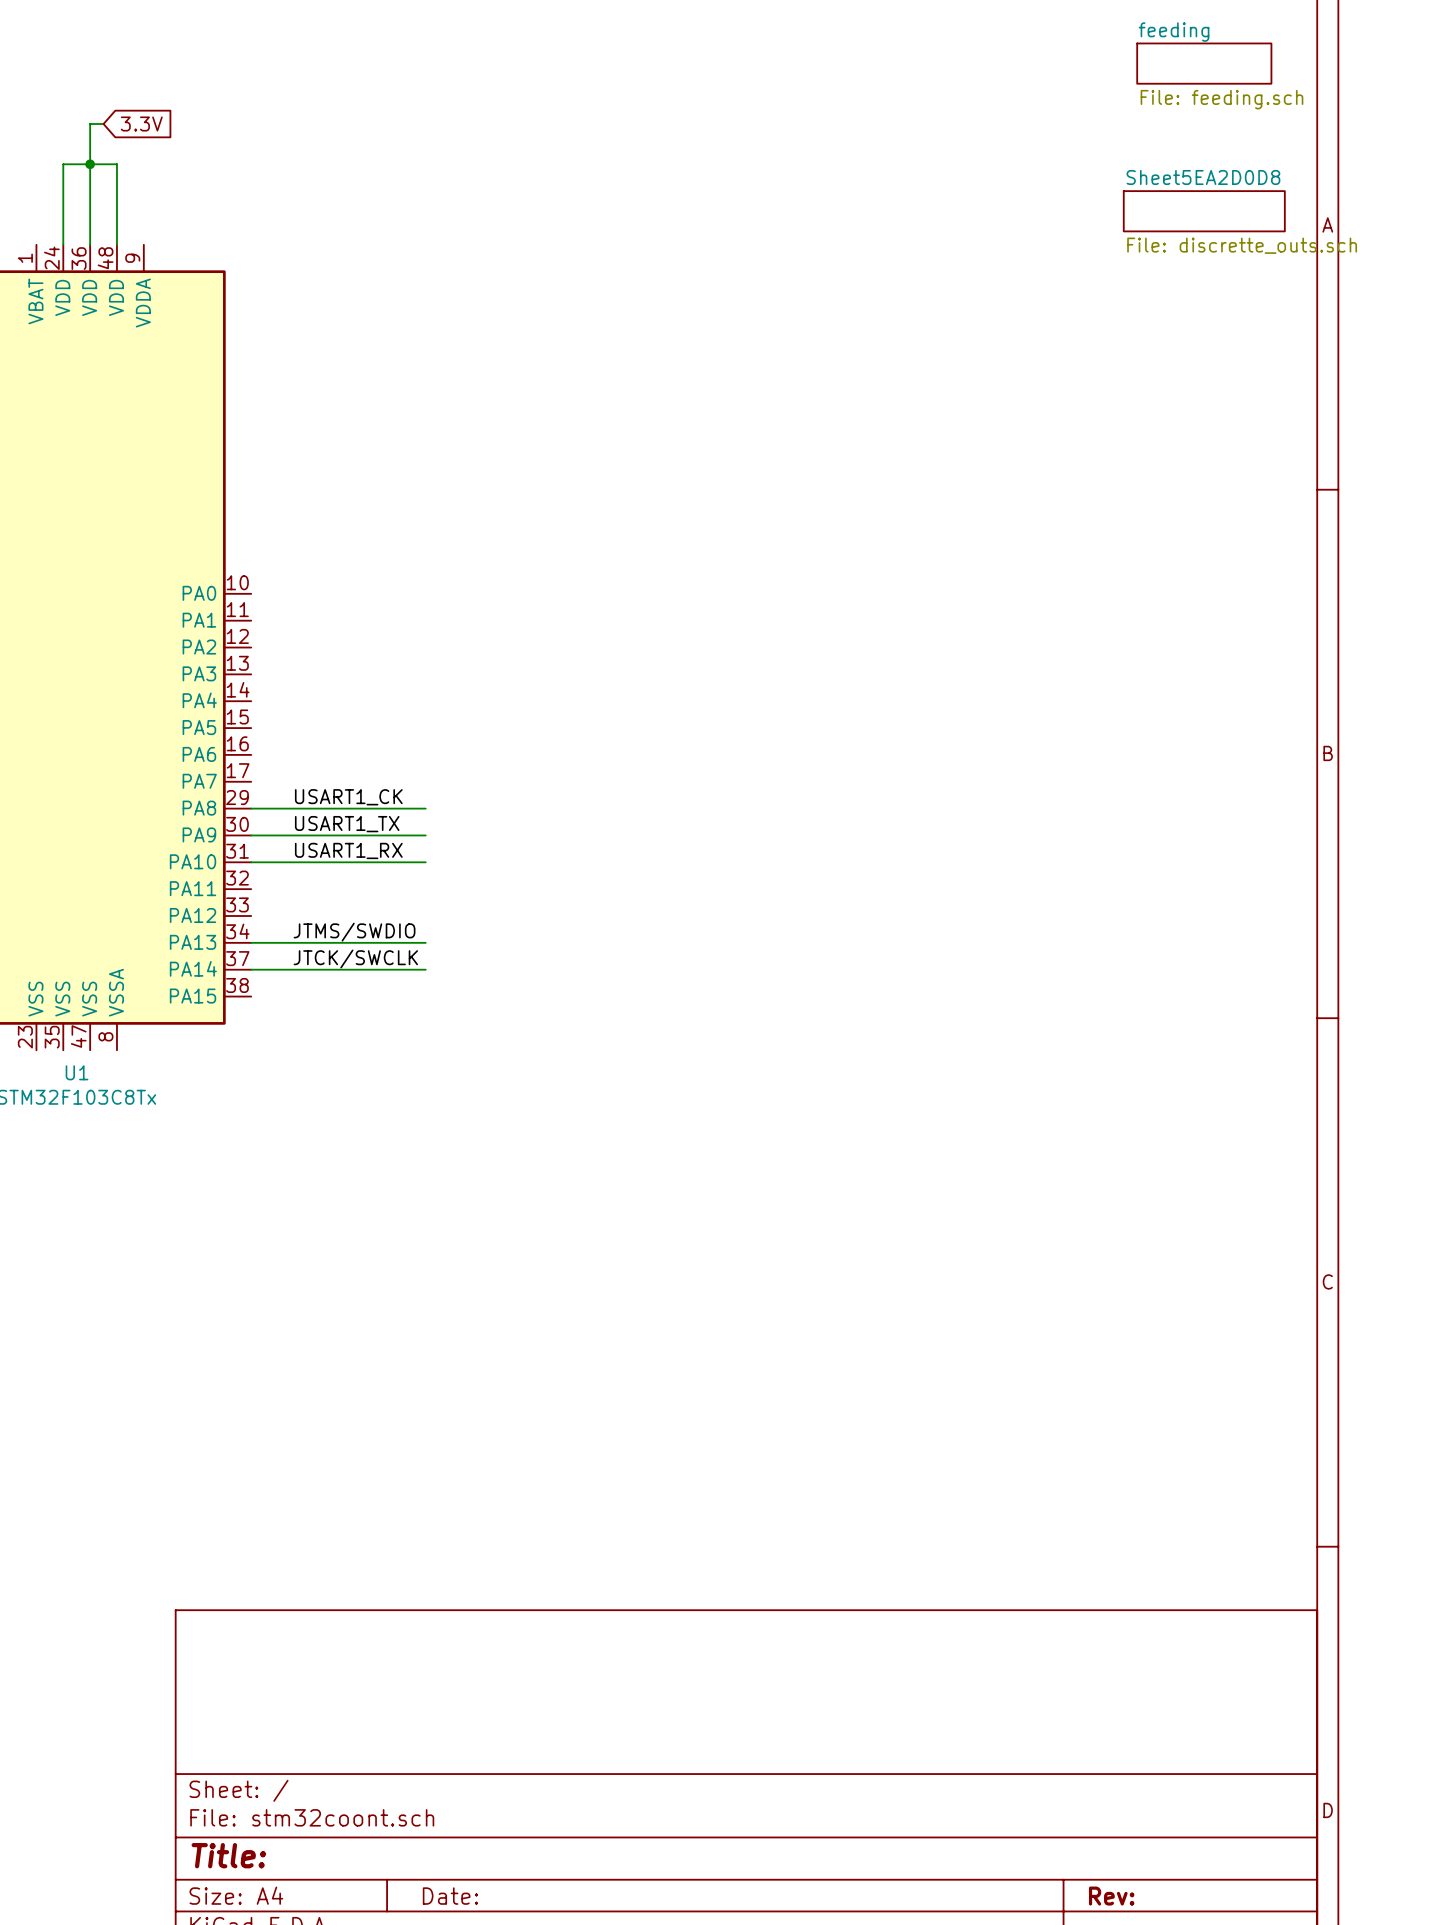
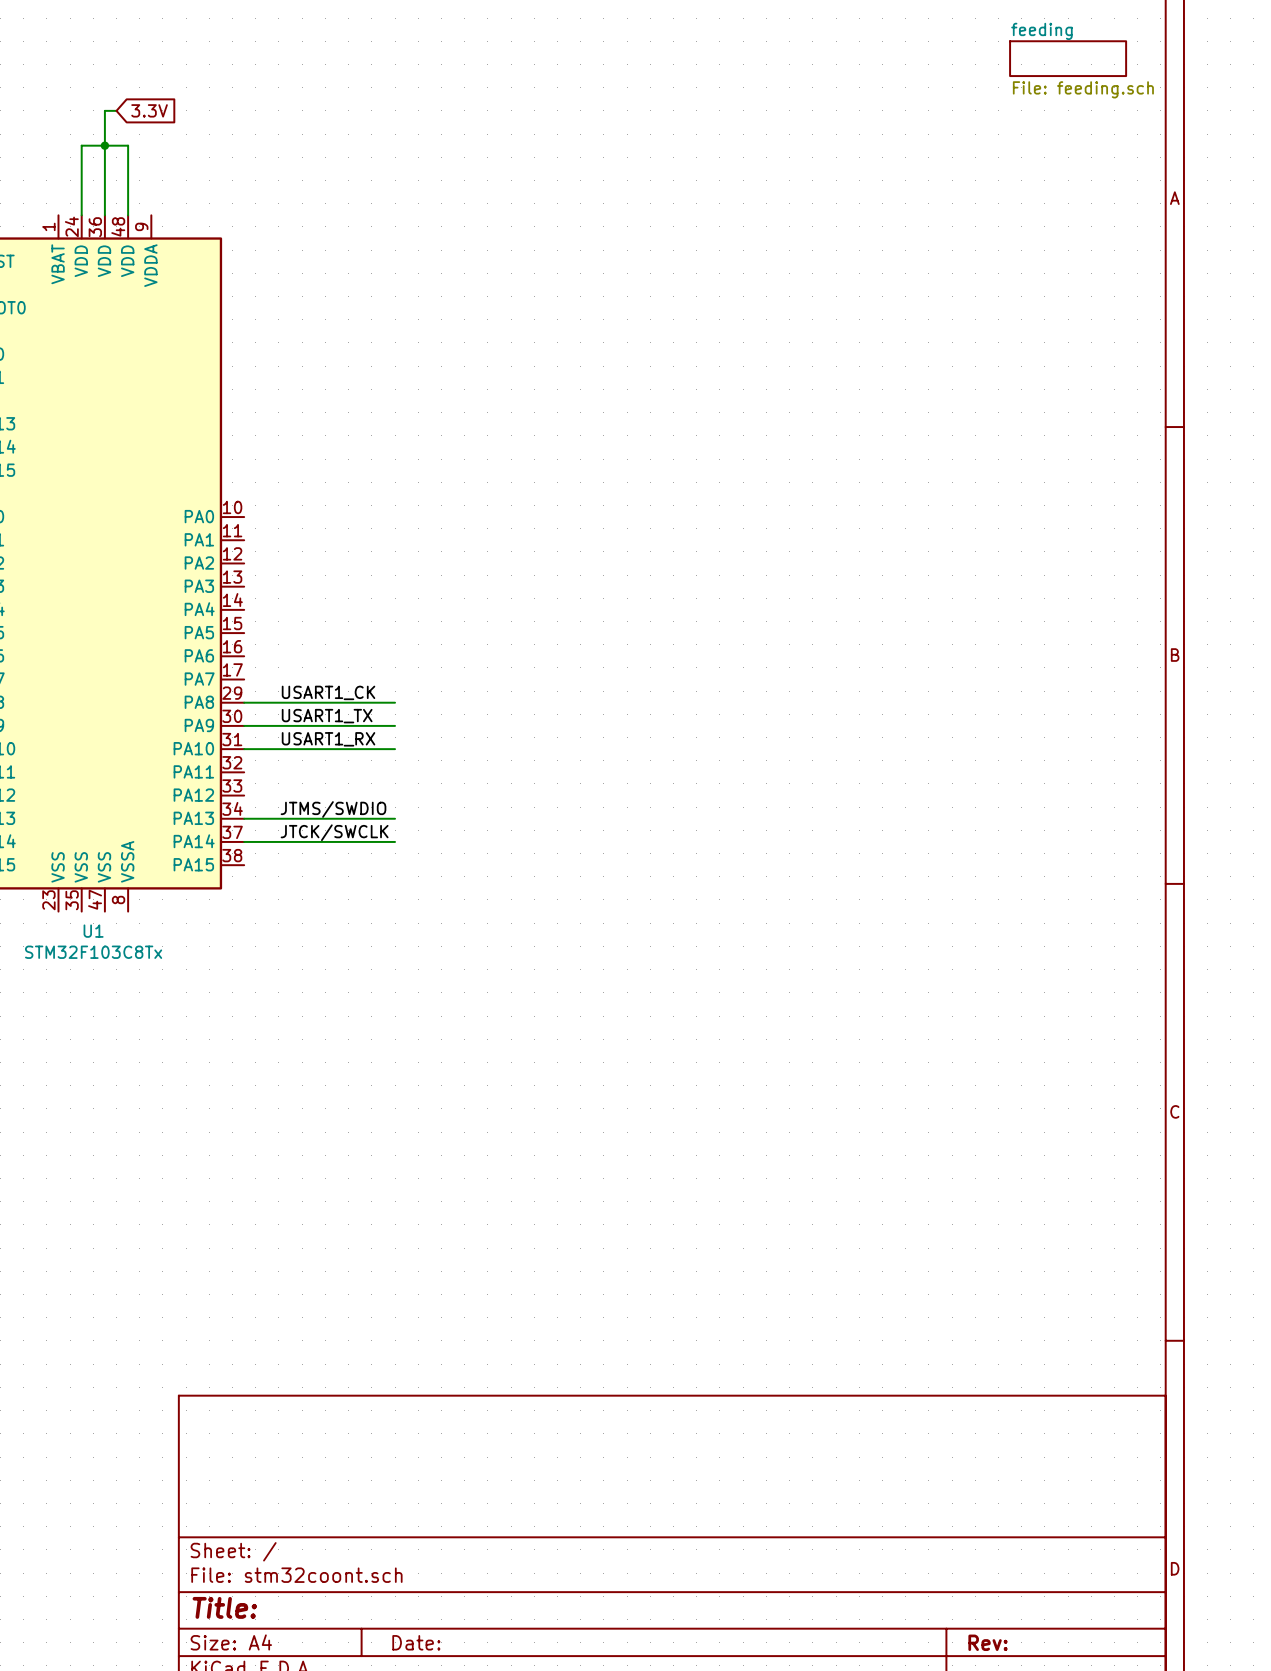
sheet Sheet5EA2D0D8: File: discrette_outs.sch (1204, 211) -> none

